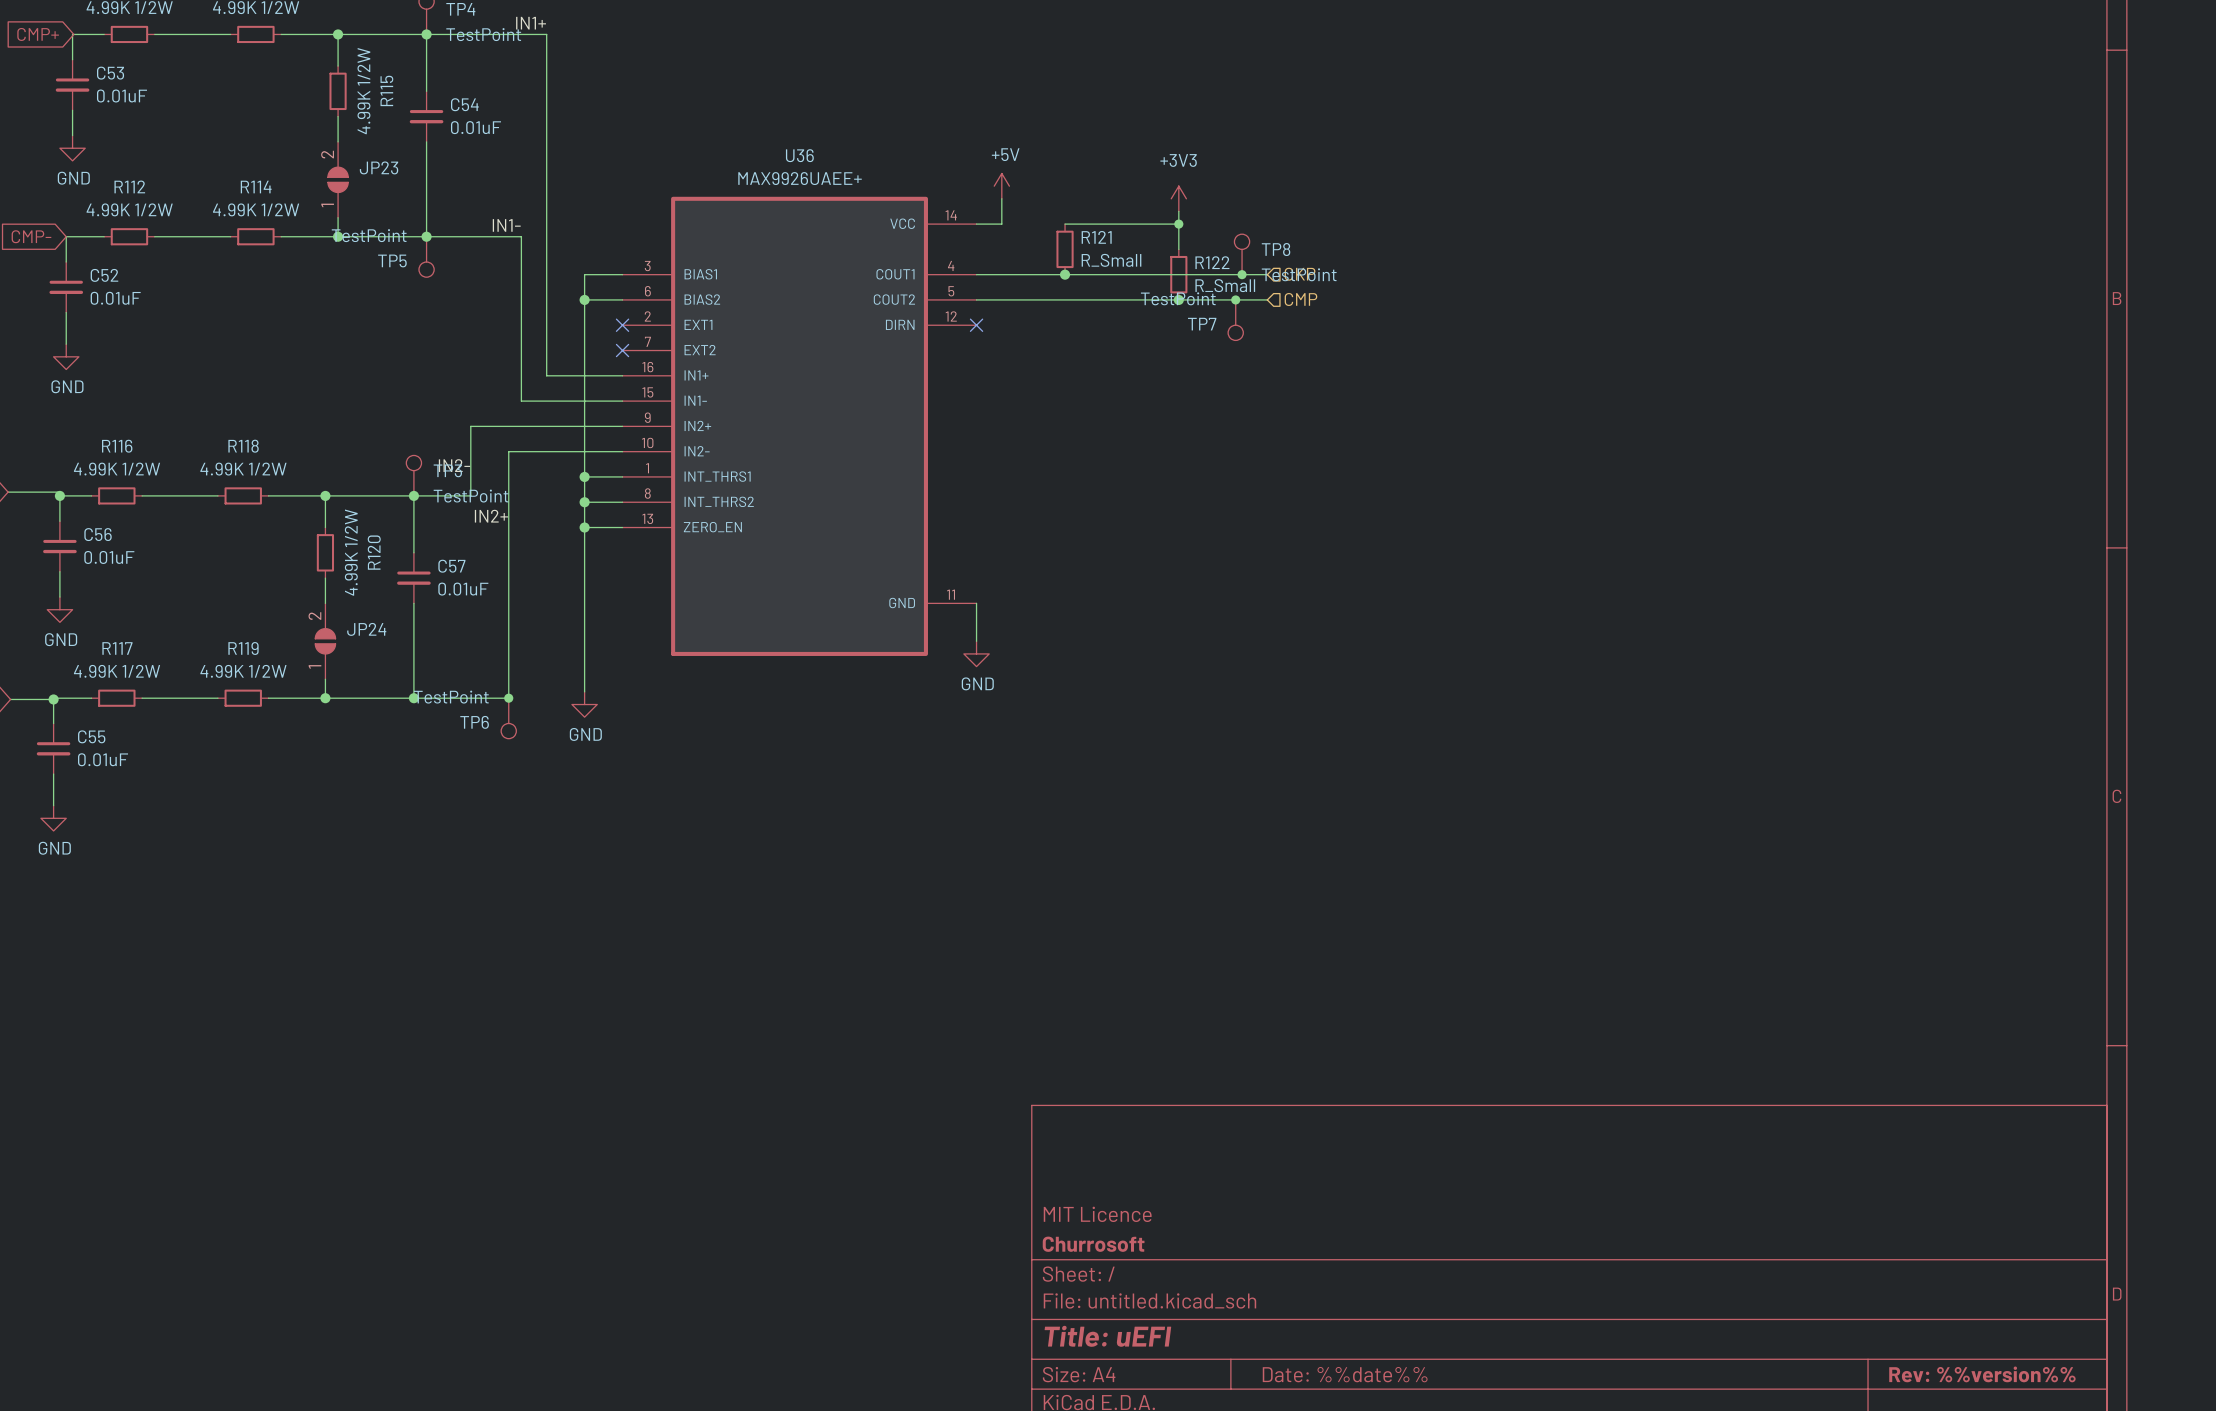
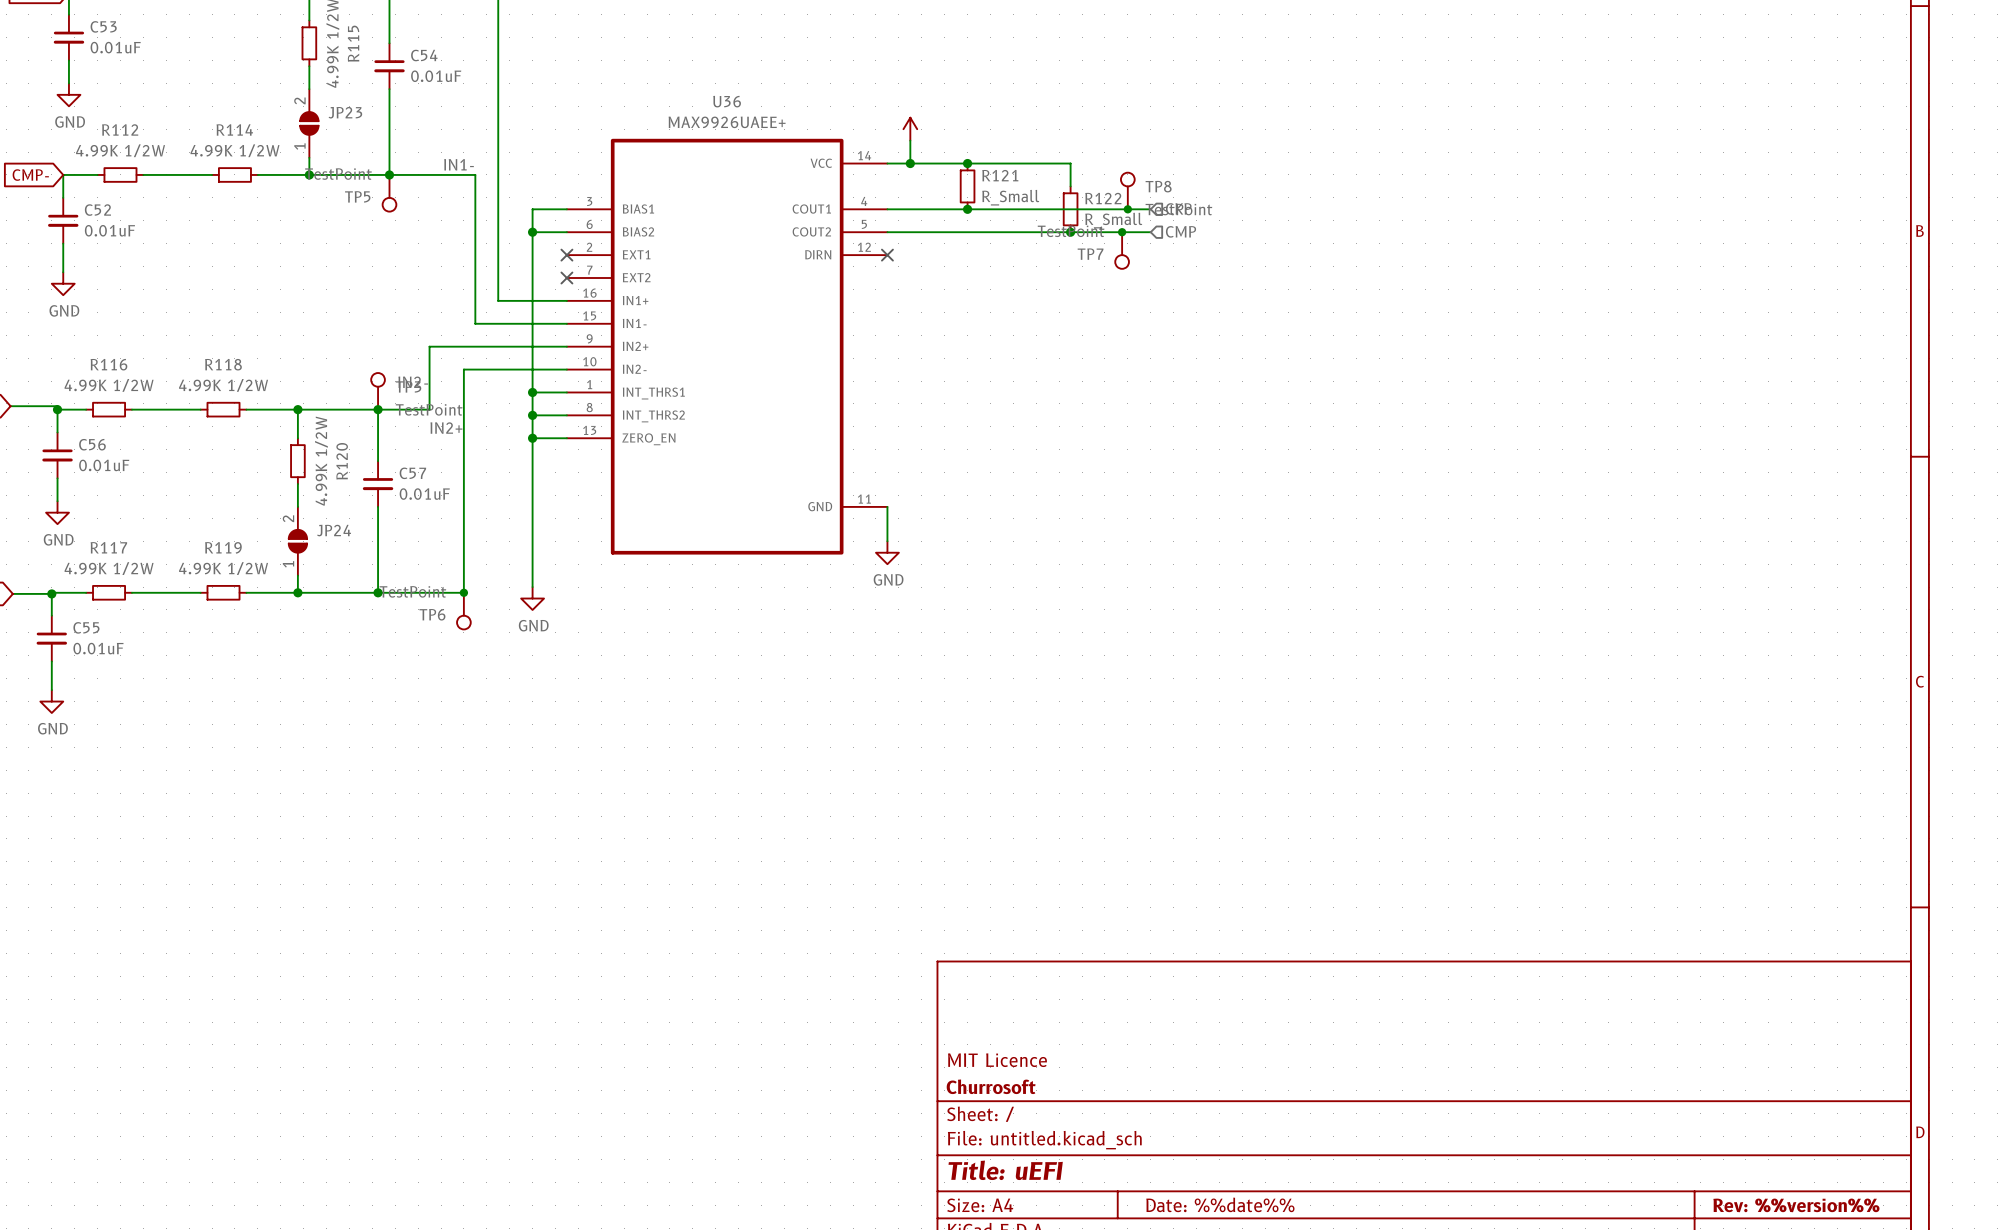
power symbol text: +5V (1005, 154) -> none
power symbol: +3V3 (1178, 198) -> none
wire: (1178, 211) (1178, 224) -> none
wire: none -> (910, 163) (967, 163)
junction: none -> (910, 163)
junction: none -> (967, 163)
junction: (1178, 224) -> none

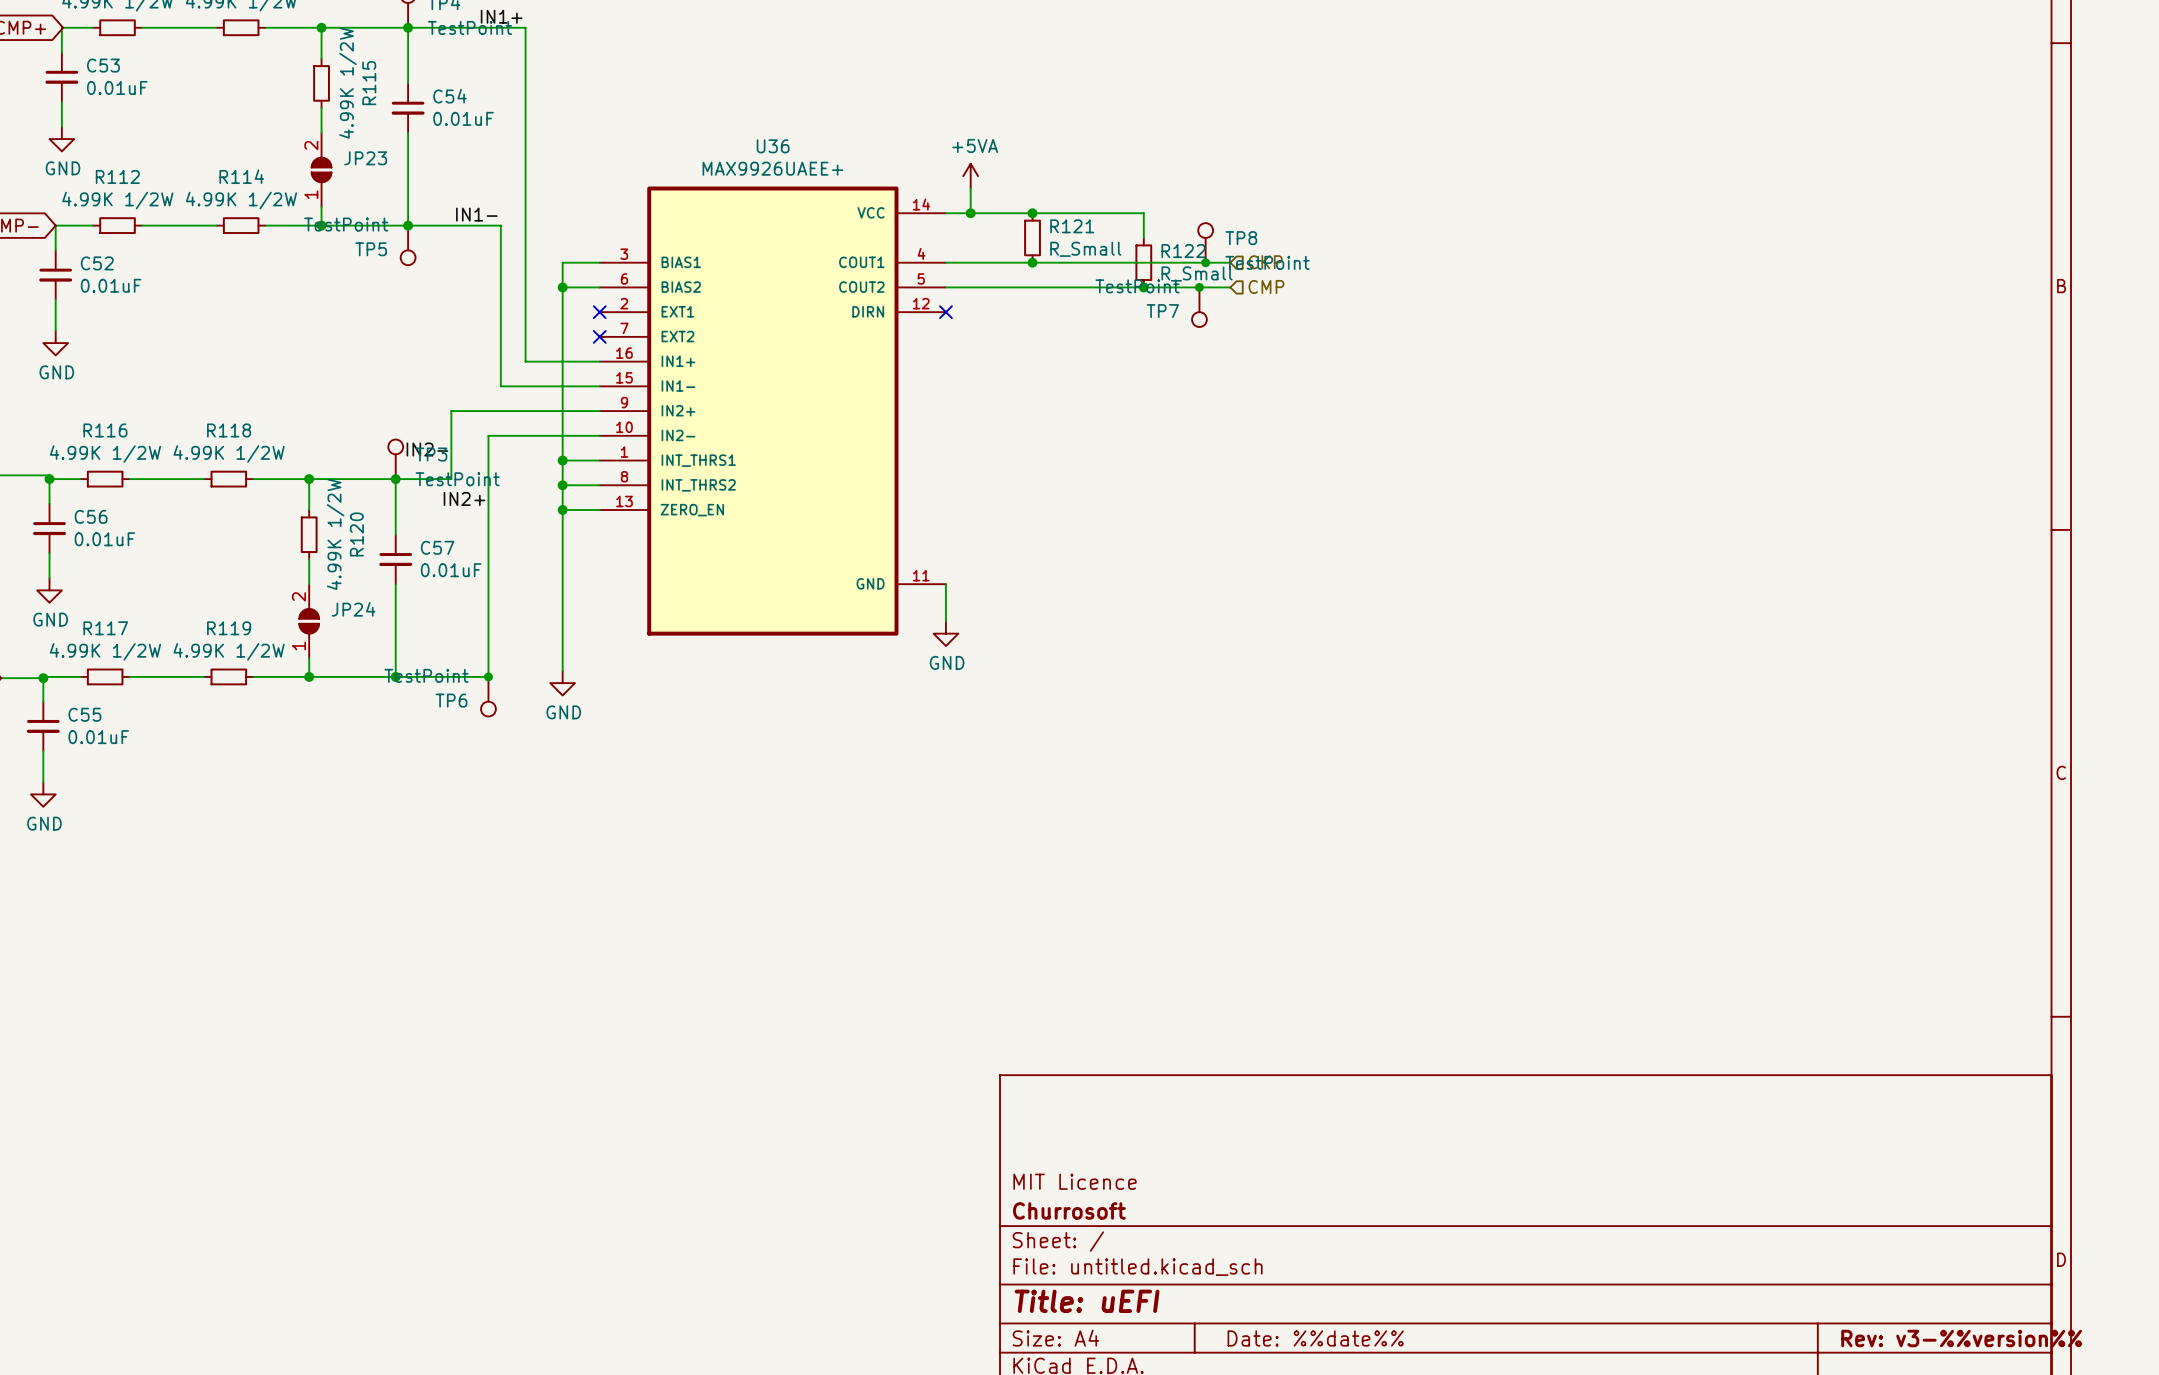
power symbol text: none -> +5VA (975, 145)
title block: Rev: %%version%% (1796, 1205) -> Rev: v3-%%version%% (1961, 1338)

